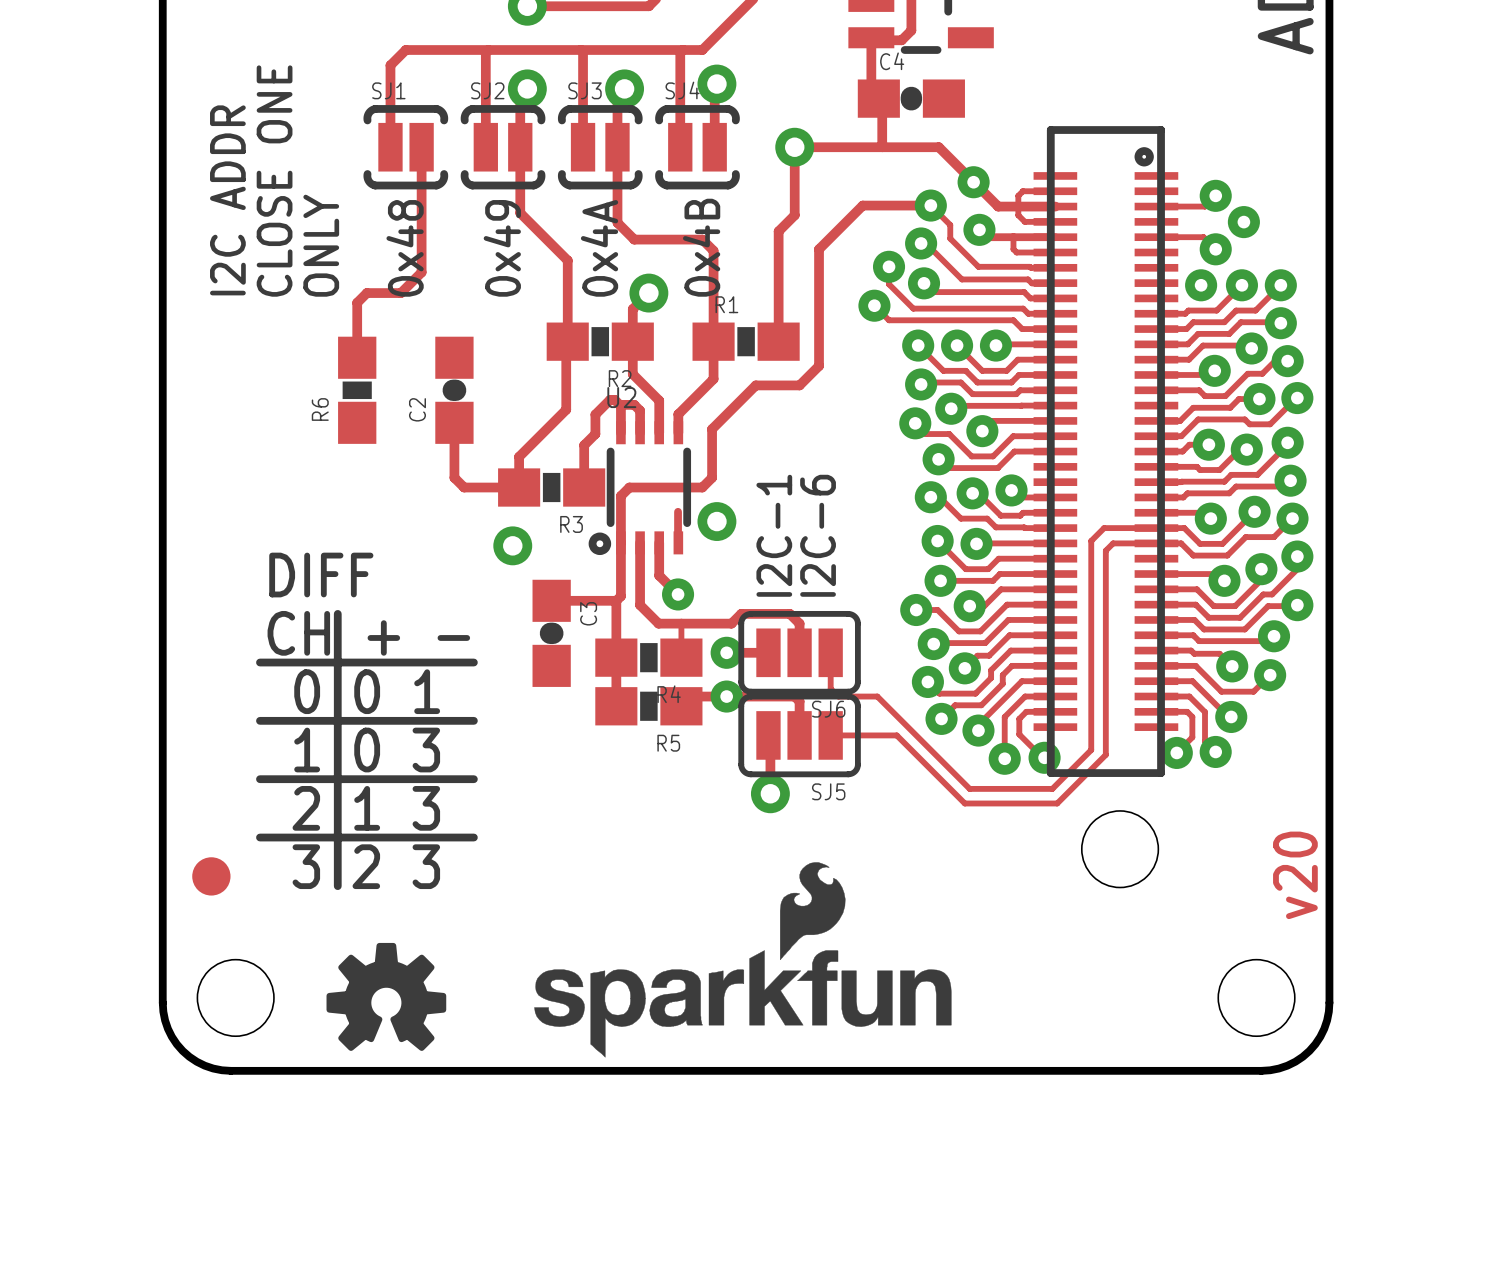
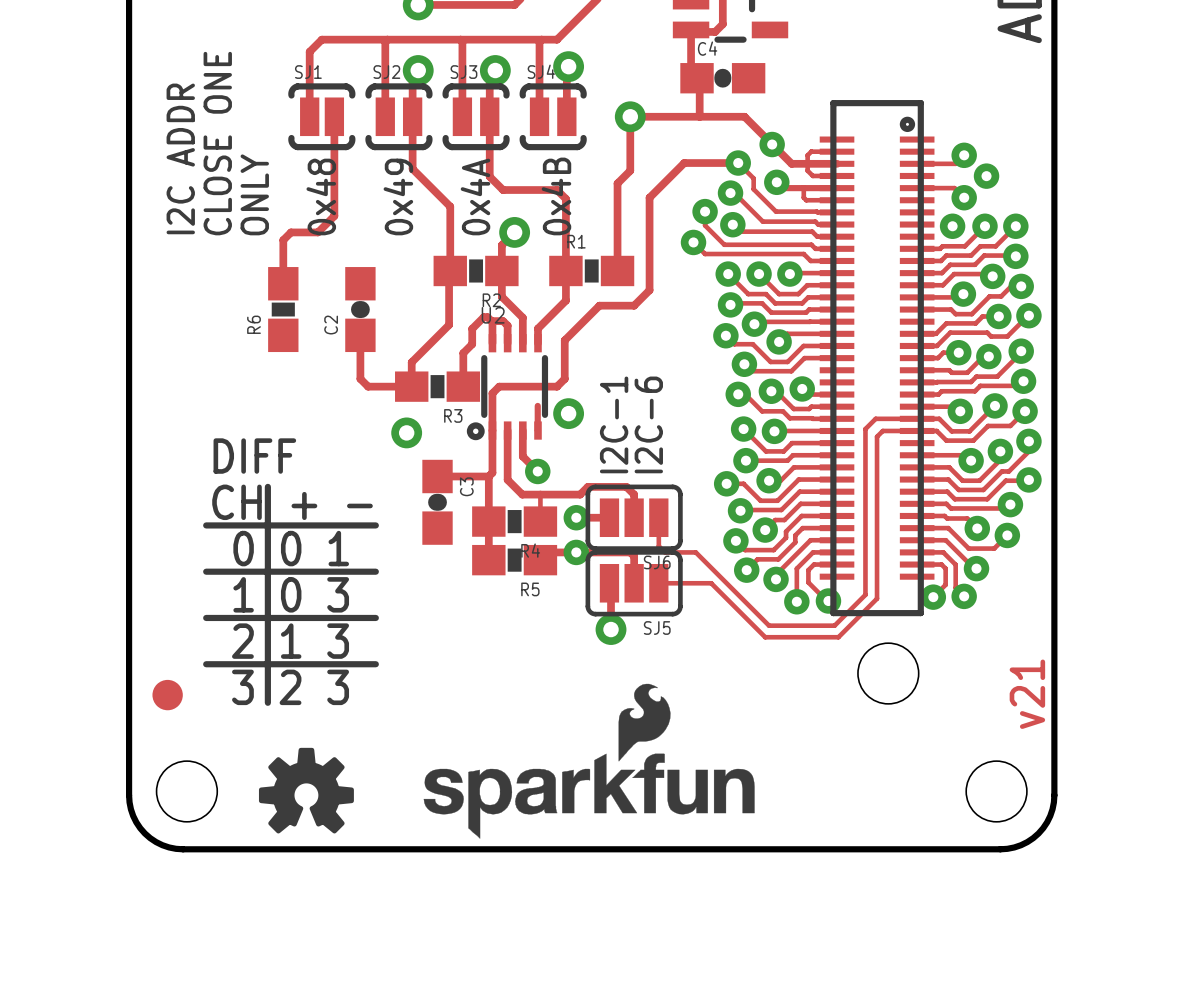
text: v20 (1295, 875) -> v21 (1027, 694)

